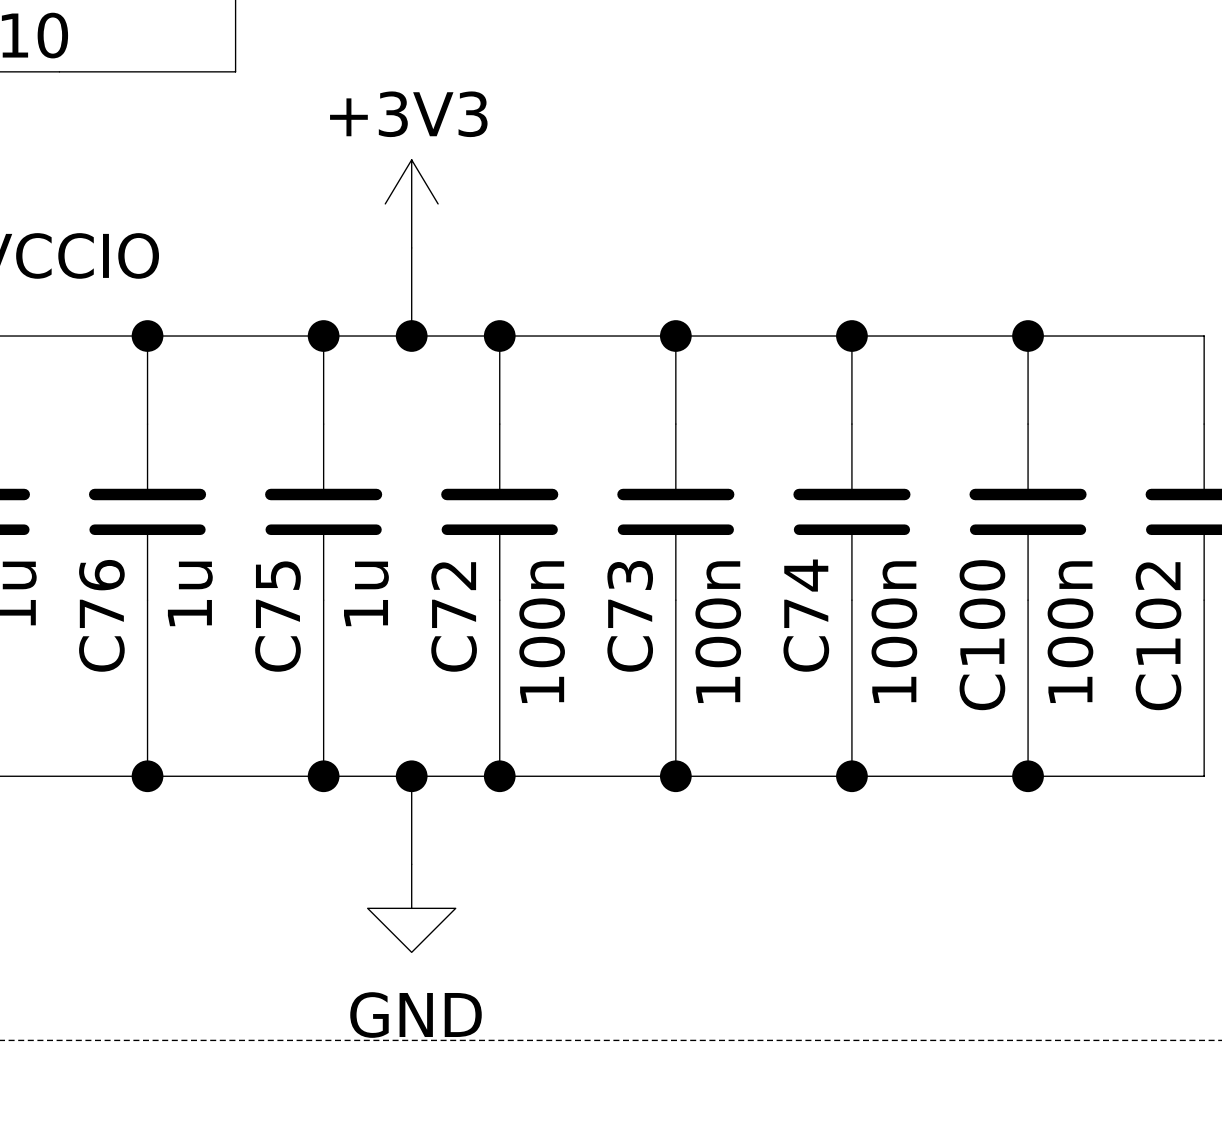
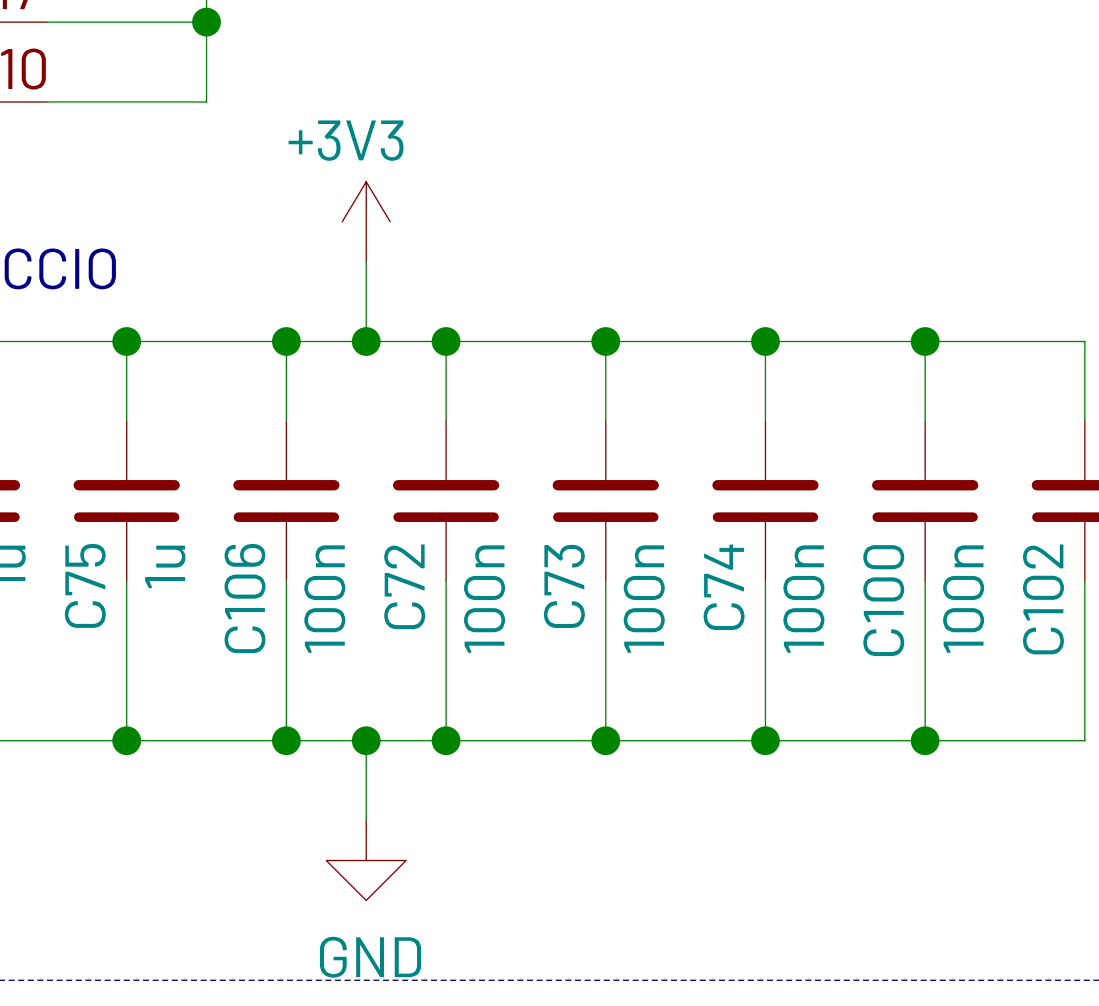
C75 value: 1u (366, 593) -> 100n (324, 599)
C76 name: C76 (101, 615) -> C75 (85, 585)
C75 name: C75 (278, 616) -> C106 (244, 598)

